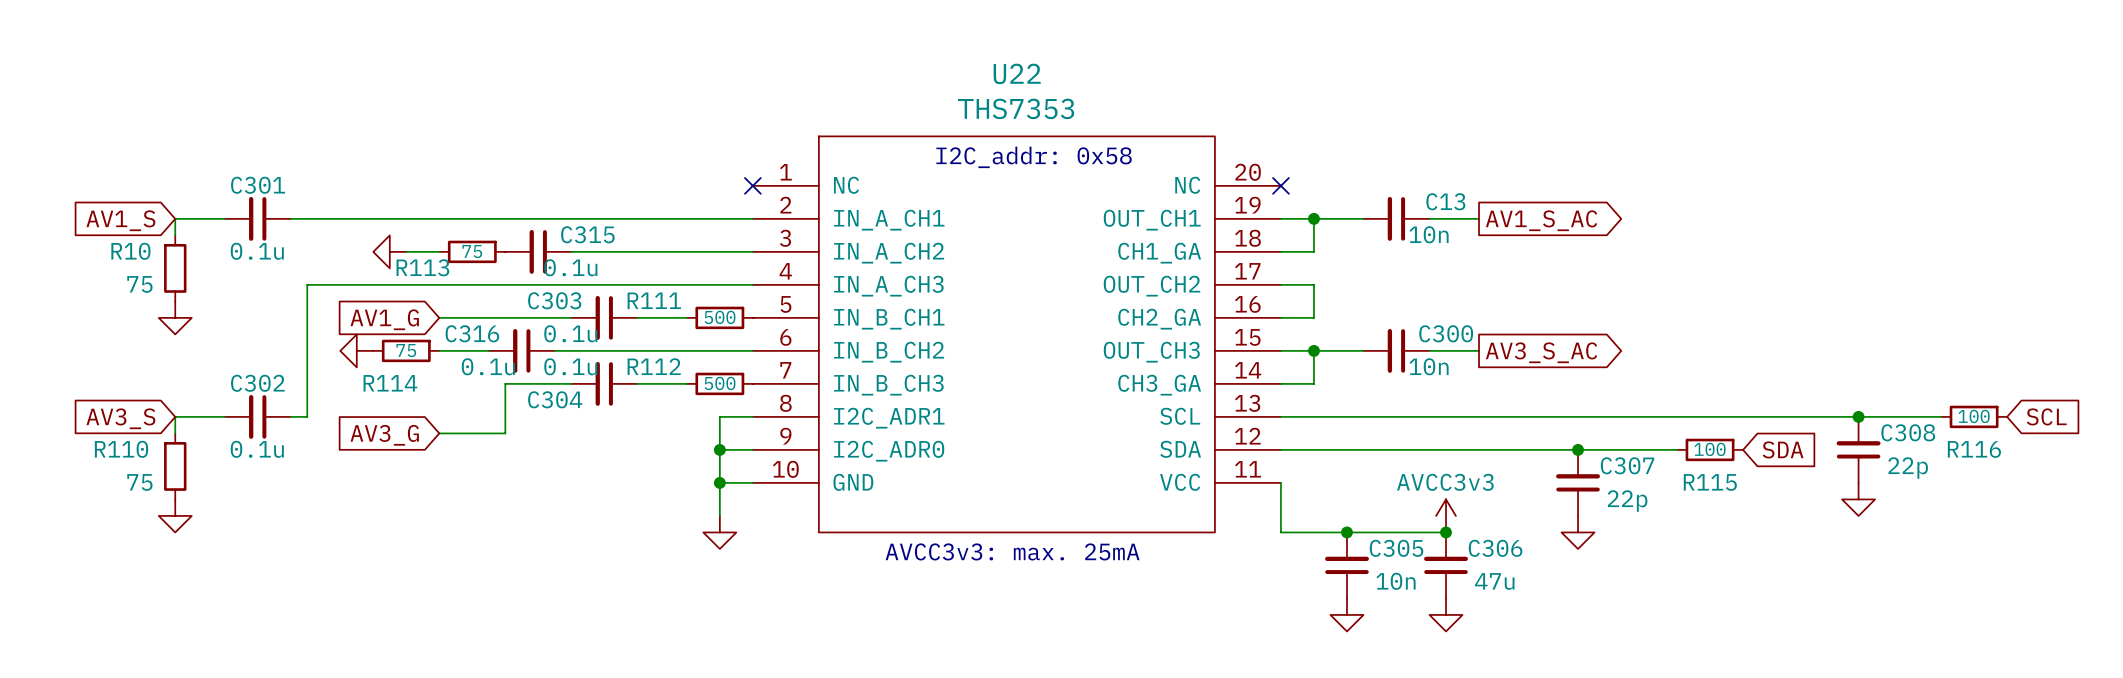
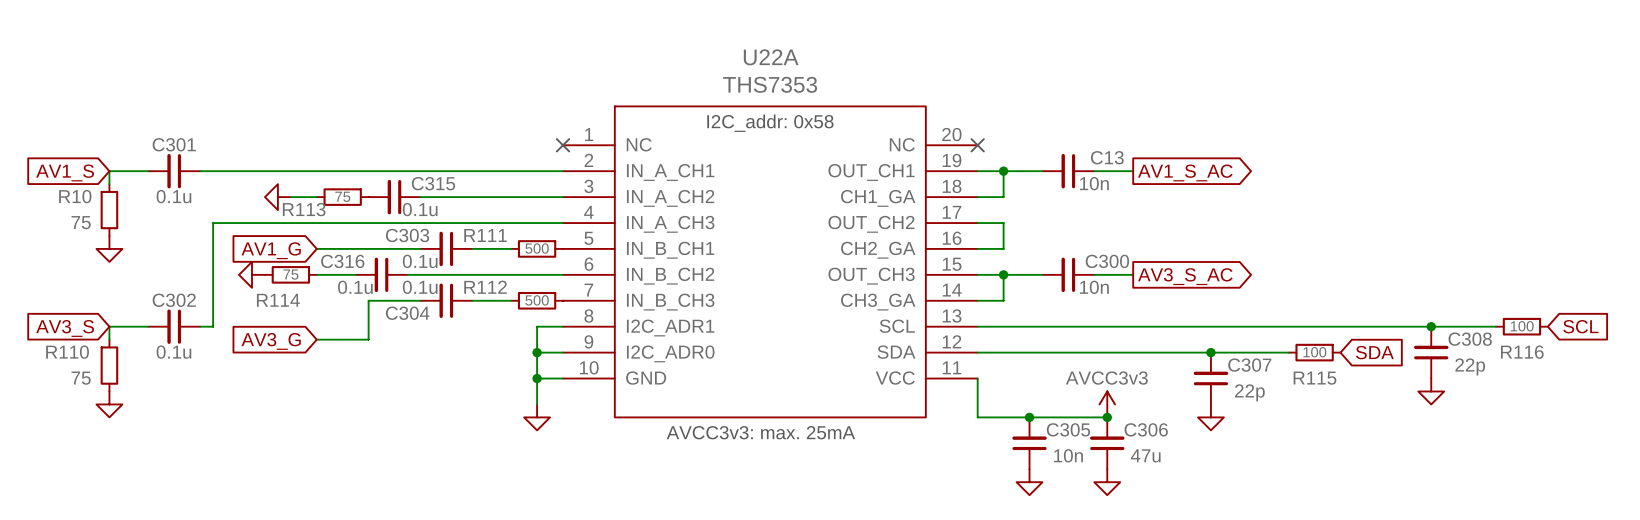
U22 name: U22 (1017, 73) -> U22A (771, 57)

